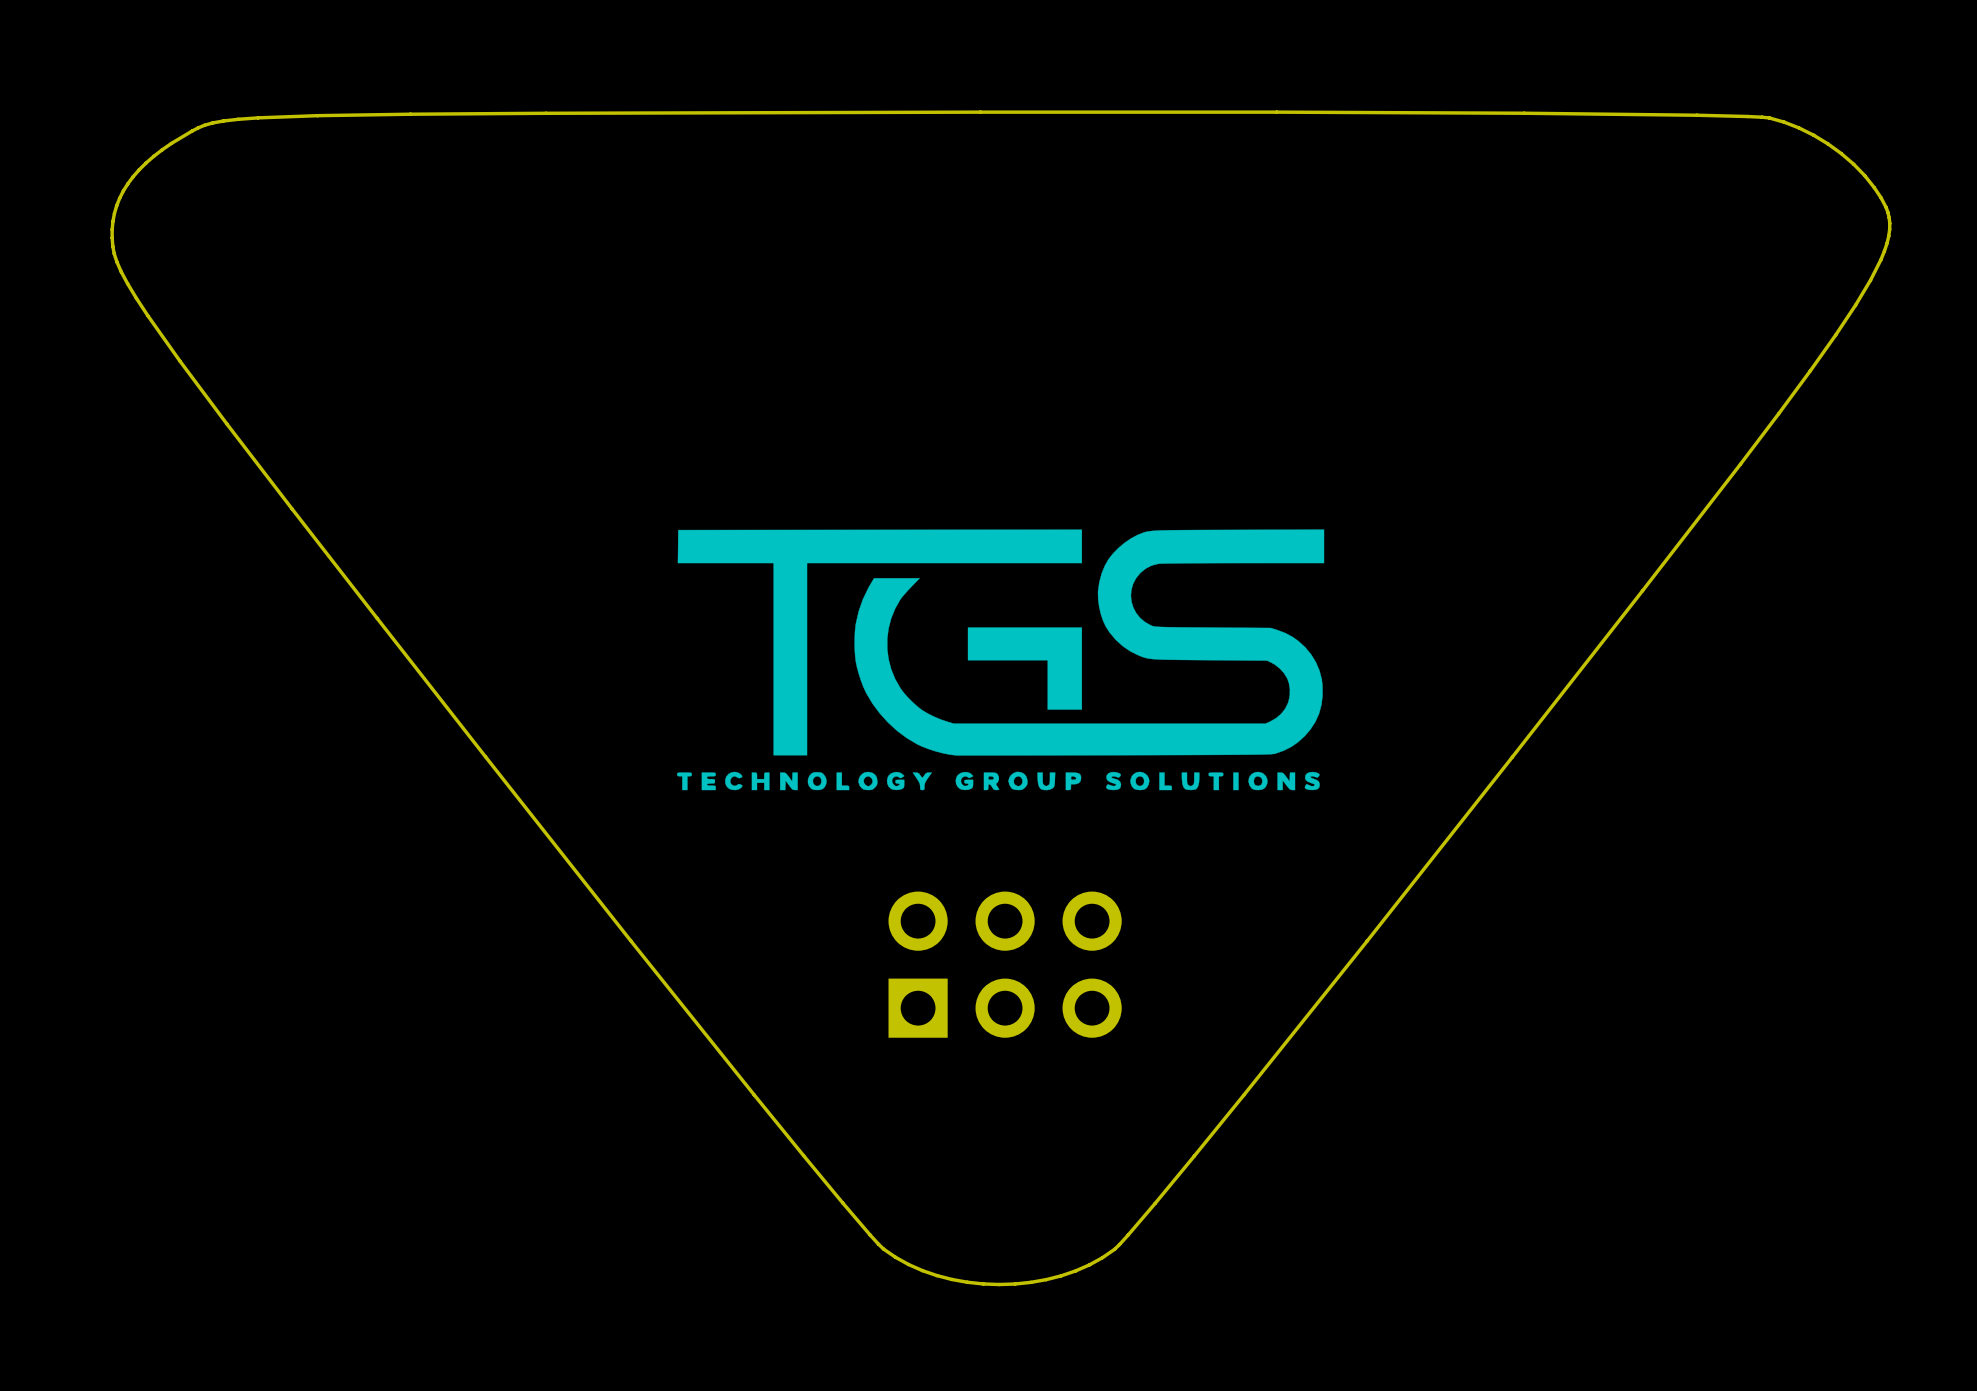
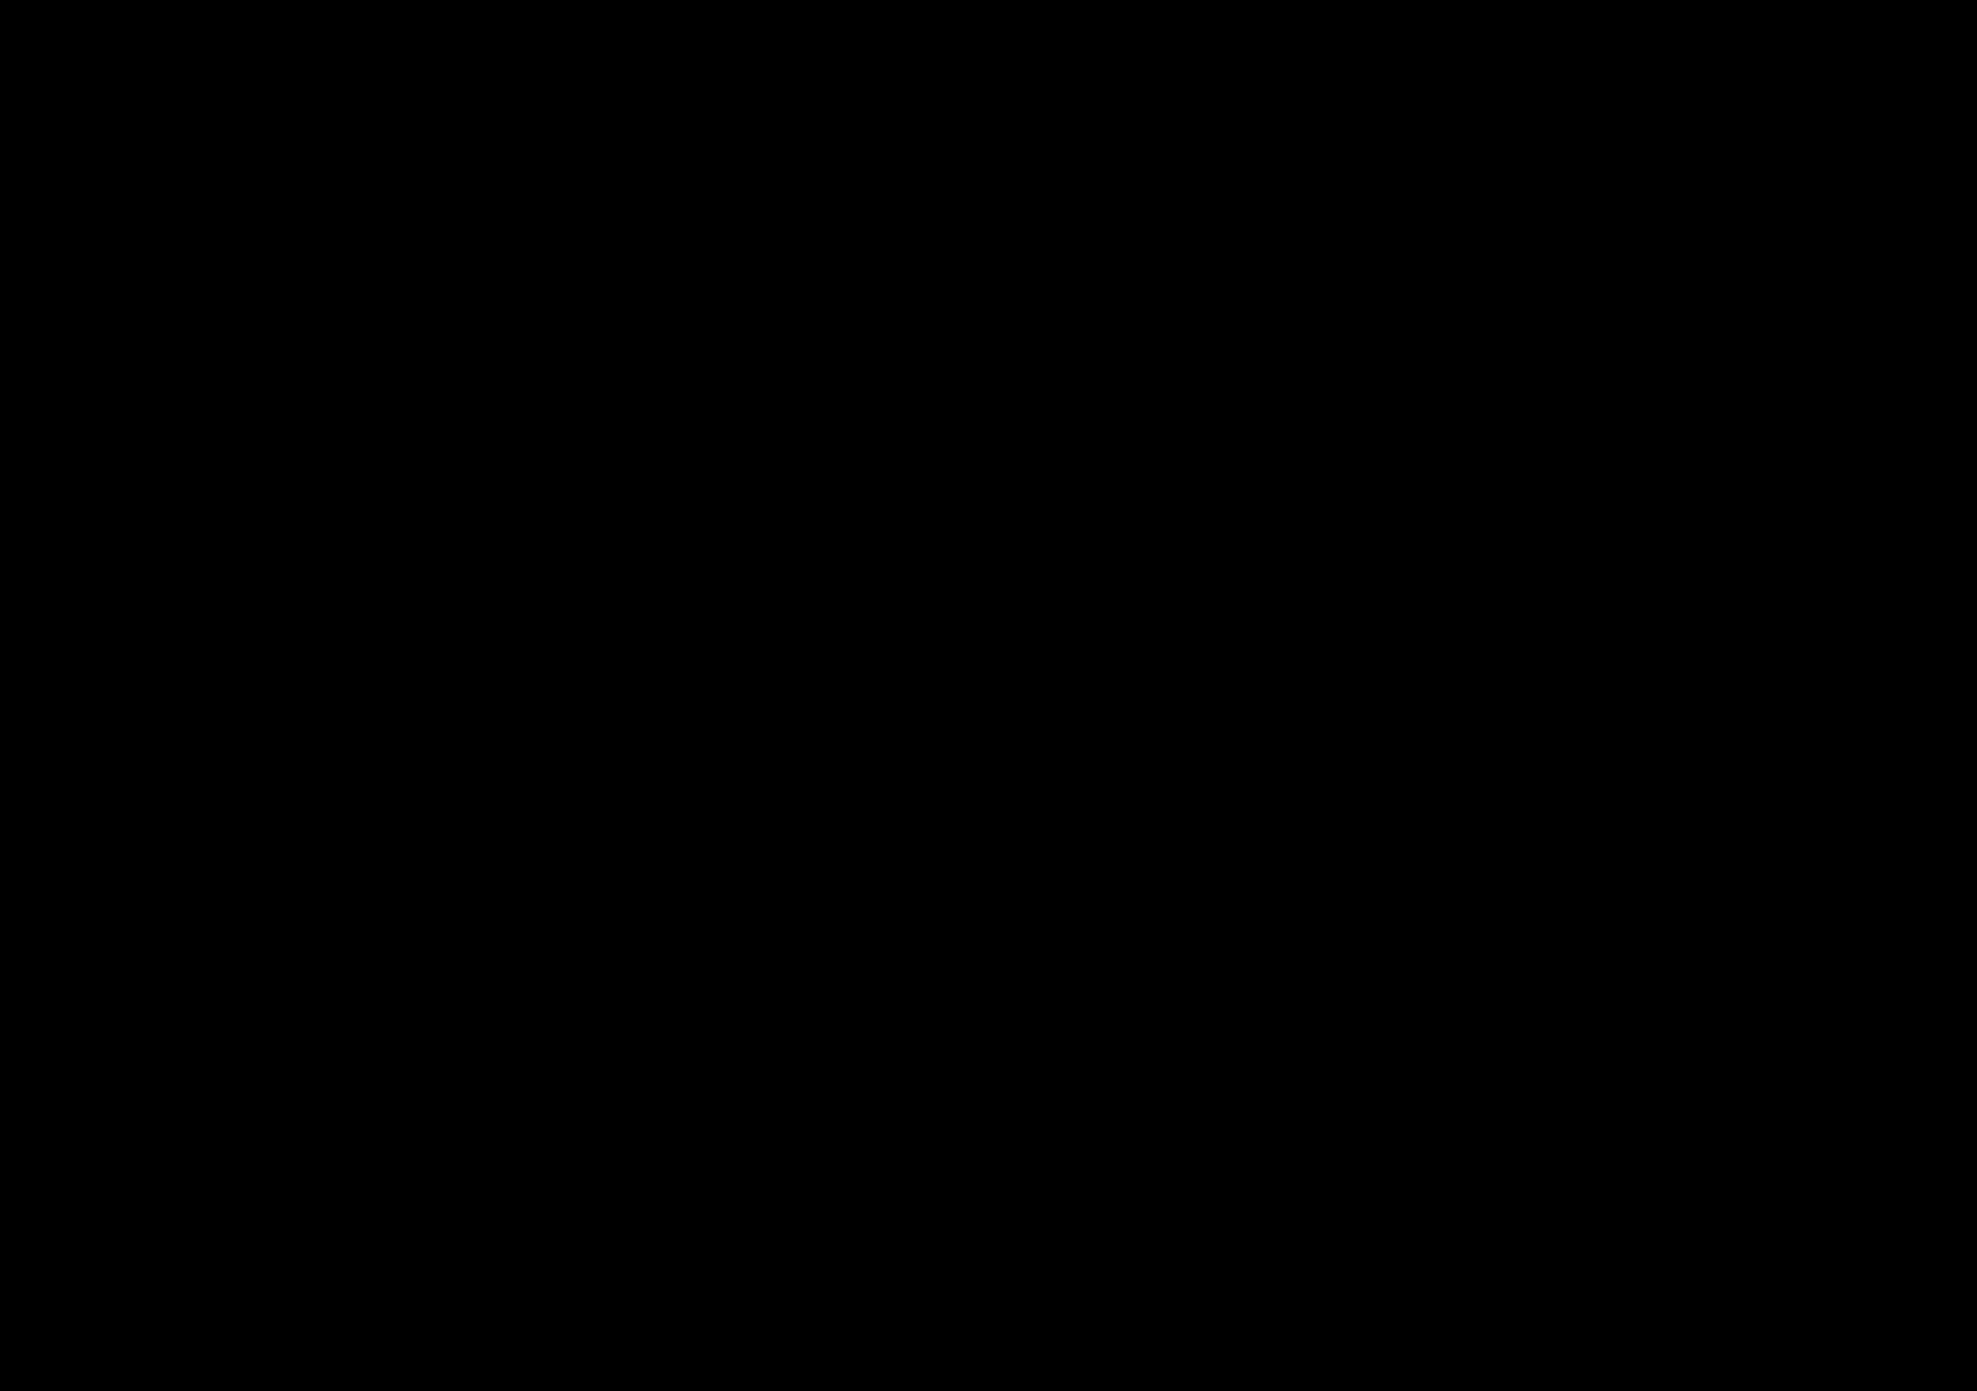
board edge: (980, 112) (1524, 113) (1769, 117) (1813, 135) (1853, 164) (1881, 197) (1887, 212) (1889, 223) (1884, 251) (1870, 280) (1835, 334) (1778, 413) (1642, 590) (1367, 941) (1155, 1203) (1114, 1249) (1089, 1264) (1046, 1279) (999, 1284) (952, 1279) (908, 1264) (883, 1248) (842, 1202) (630, 940) (227, 424) (136, 298) (116, 262) (112, 237) (114, 213) (119, 198) (139, 169) (162, 149) (192, 130) (204, 125) (223, 121) (317, 115) (410, 114) (980, 112) -> none
drawing: [677, 529, 1325, 791] -> none
part: (1005, 964) -> none

